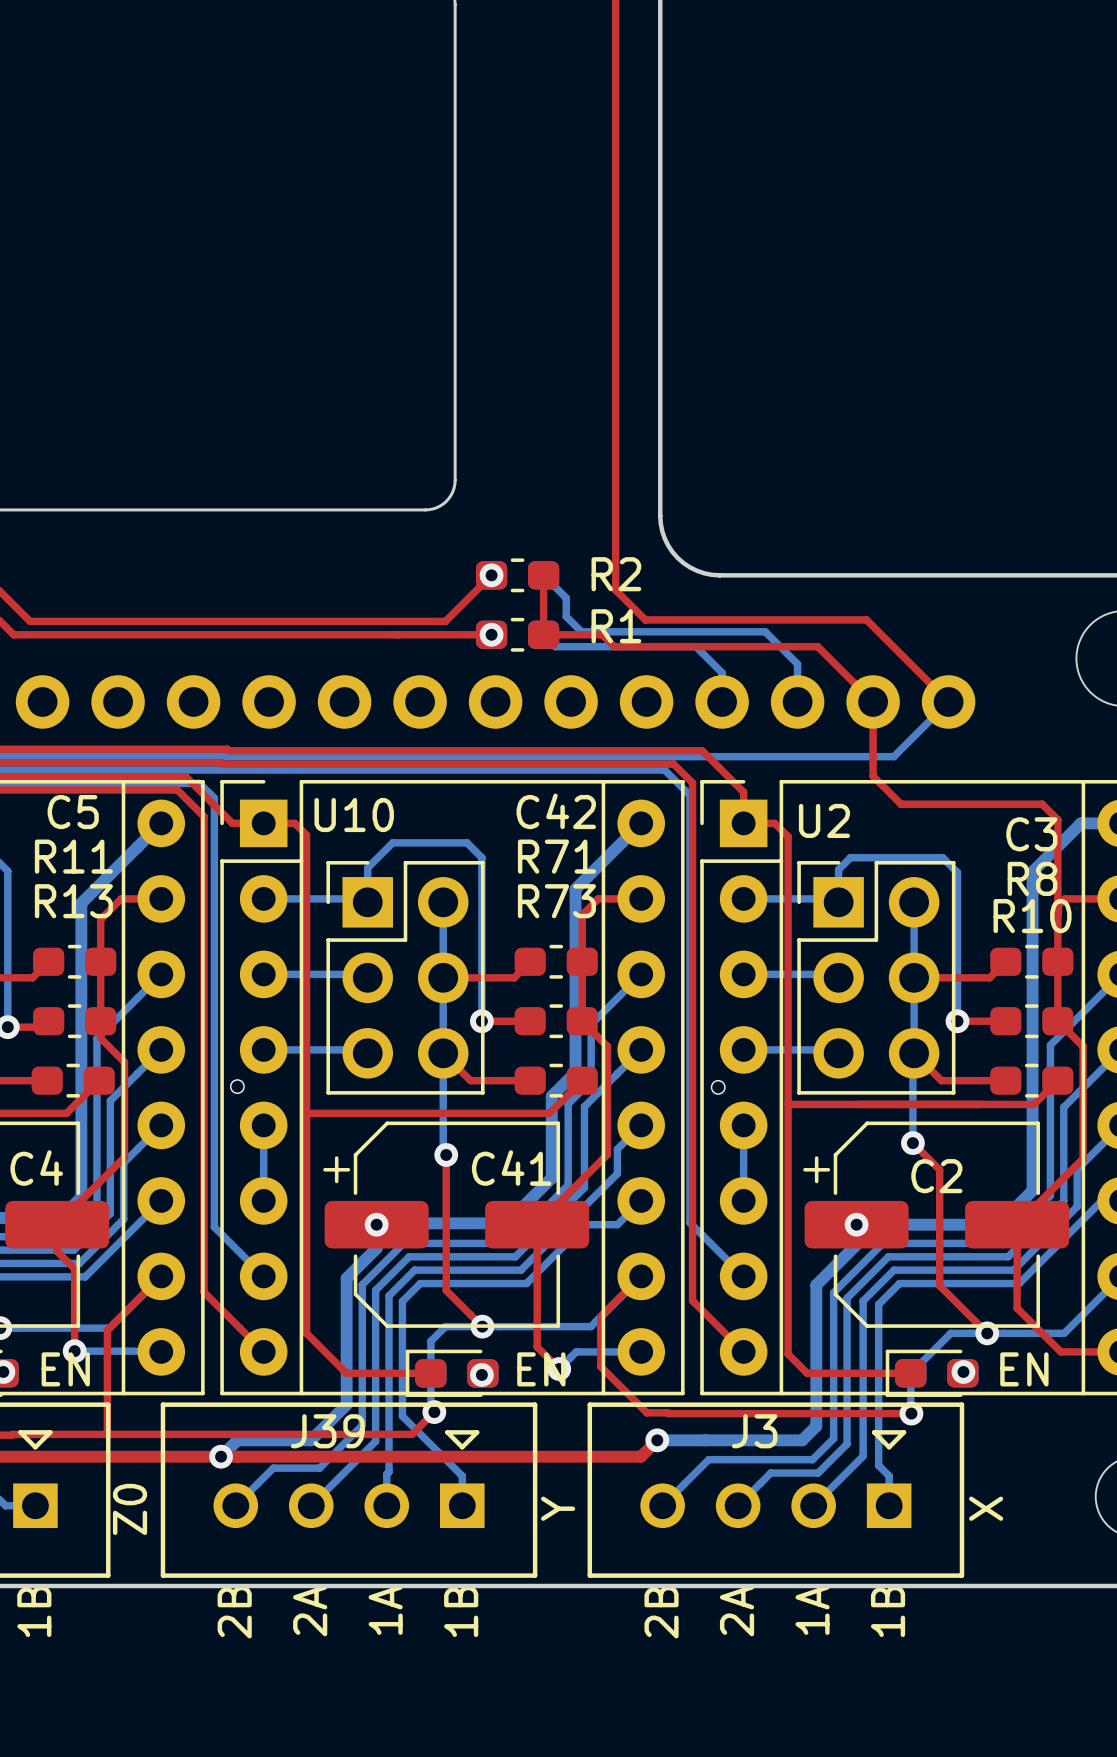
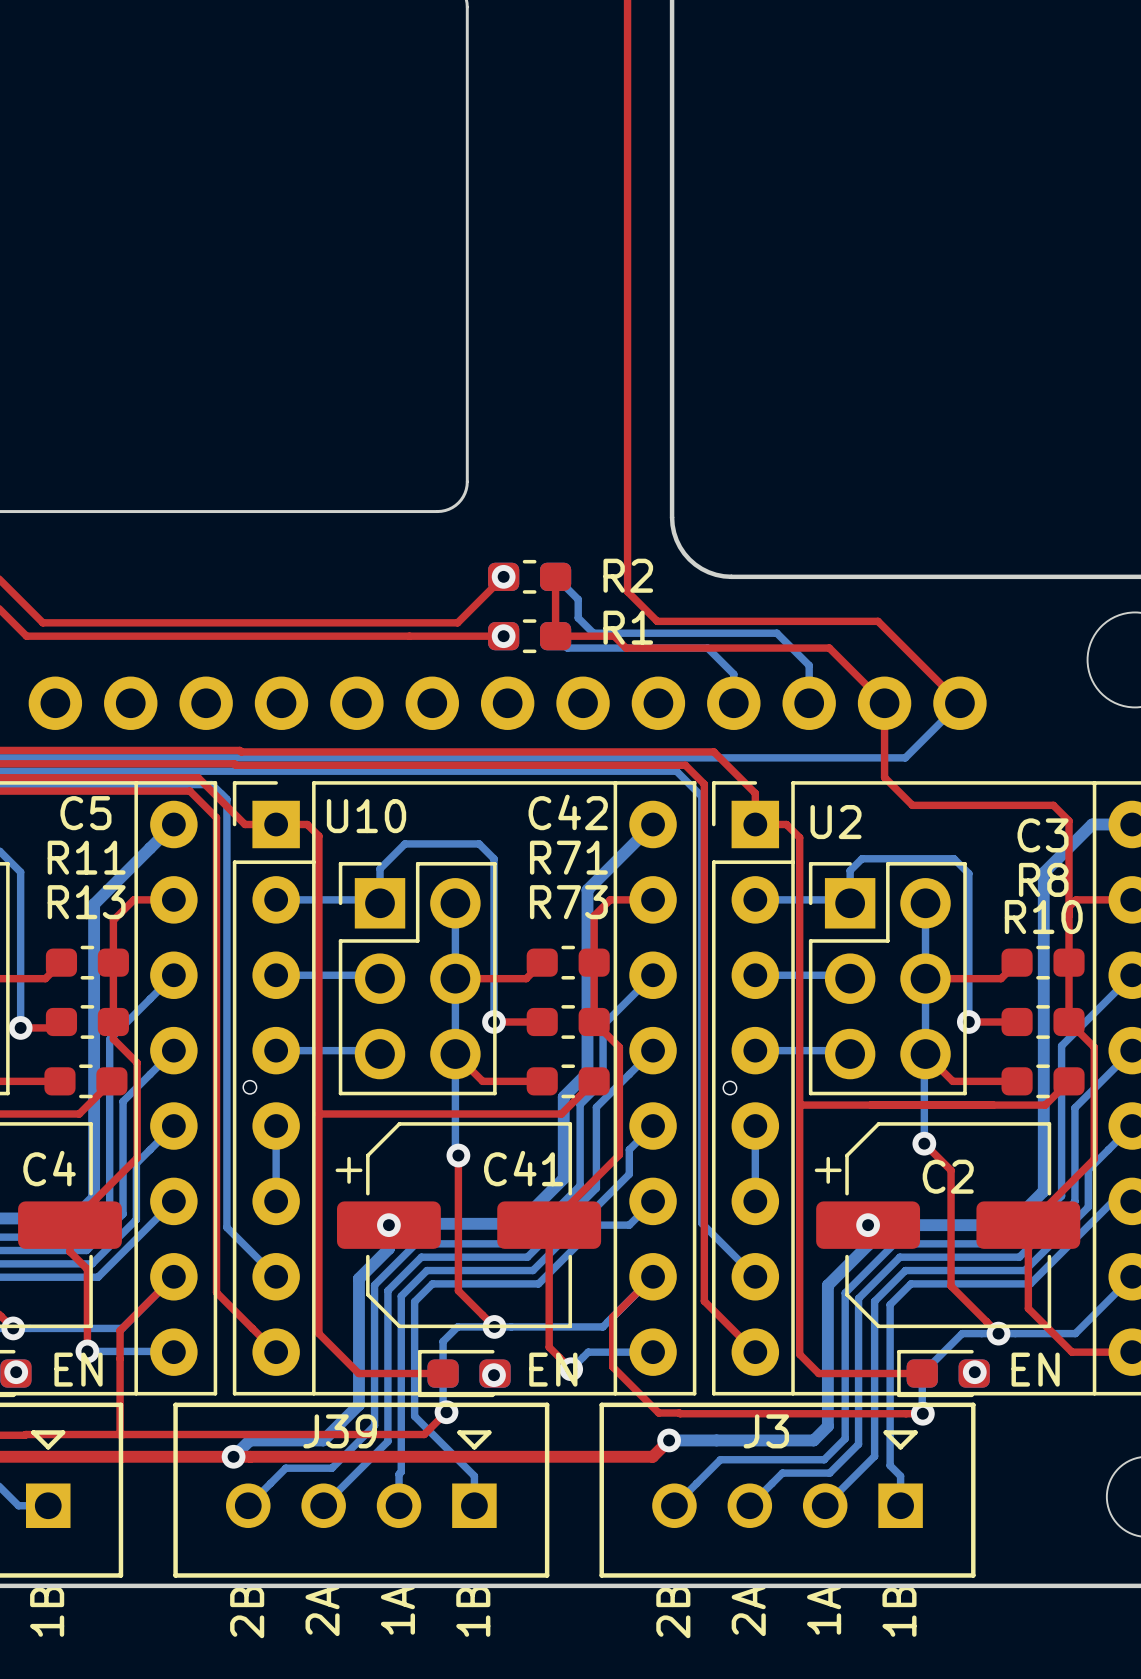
text: Y (558, 1508) -> none
text: X (986, 1508) -> none
text: Z0 (130, 1509) -> none

